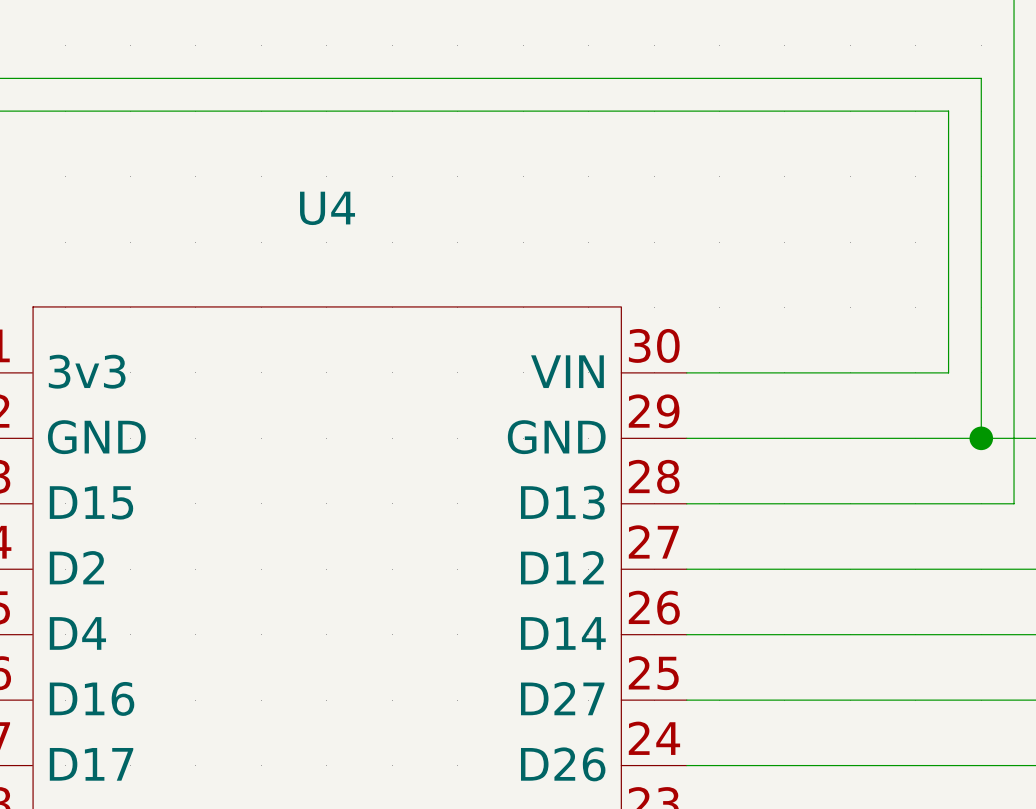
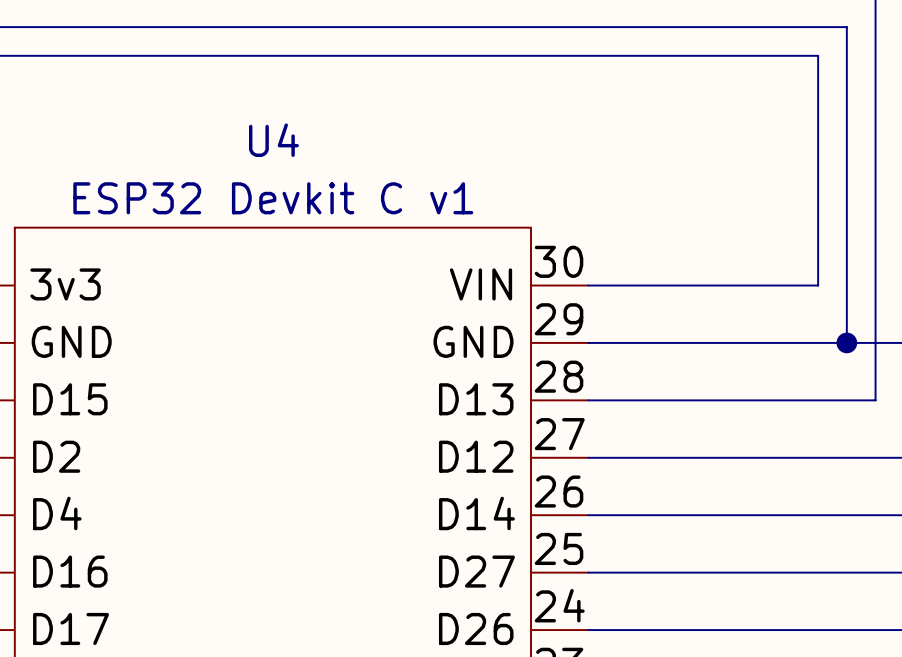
U4 value: none -> ESP32 Devkit C v1 (273, 198)

